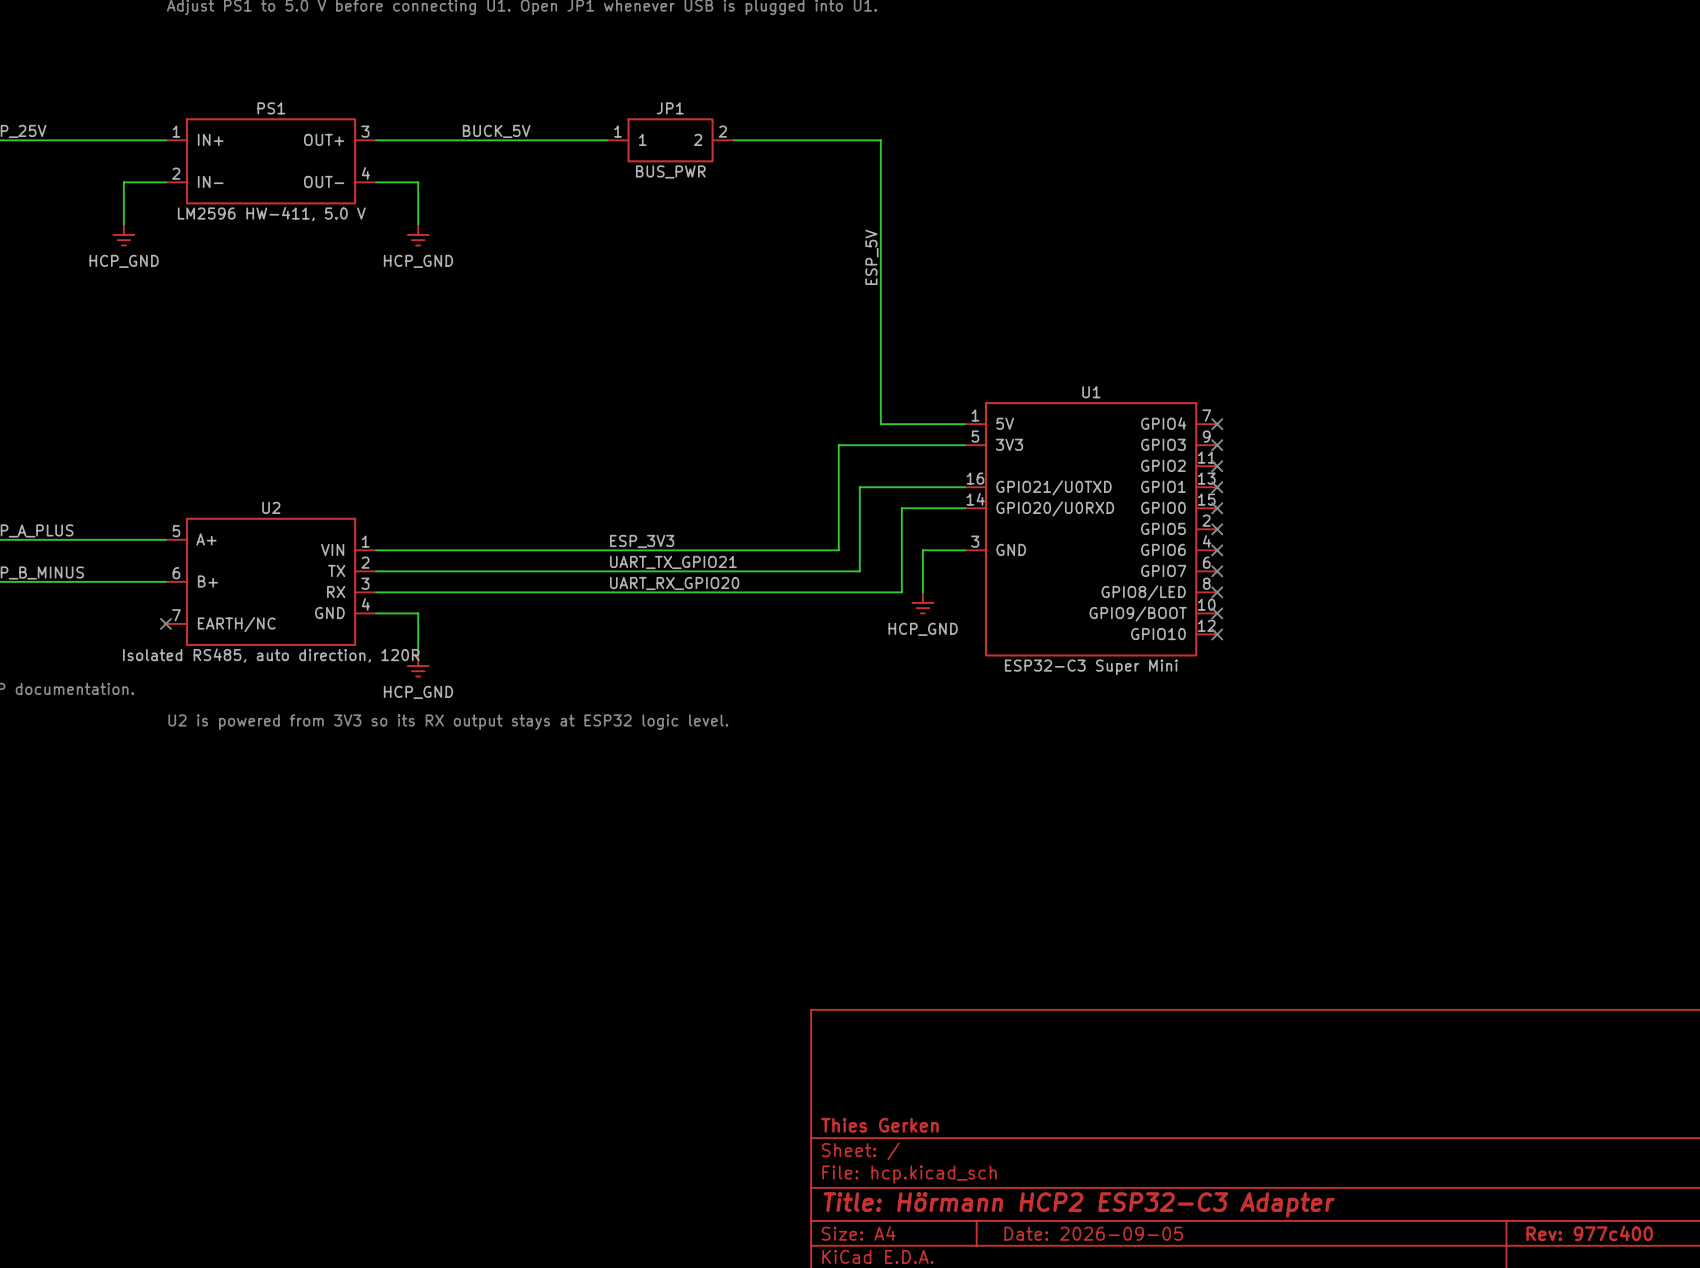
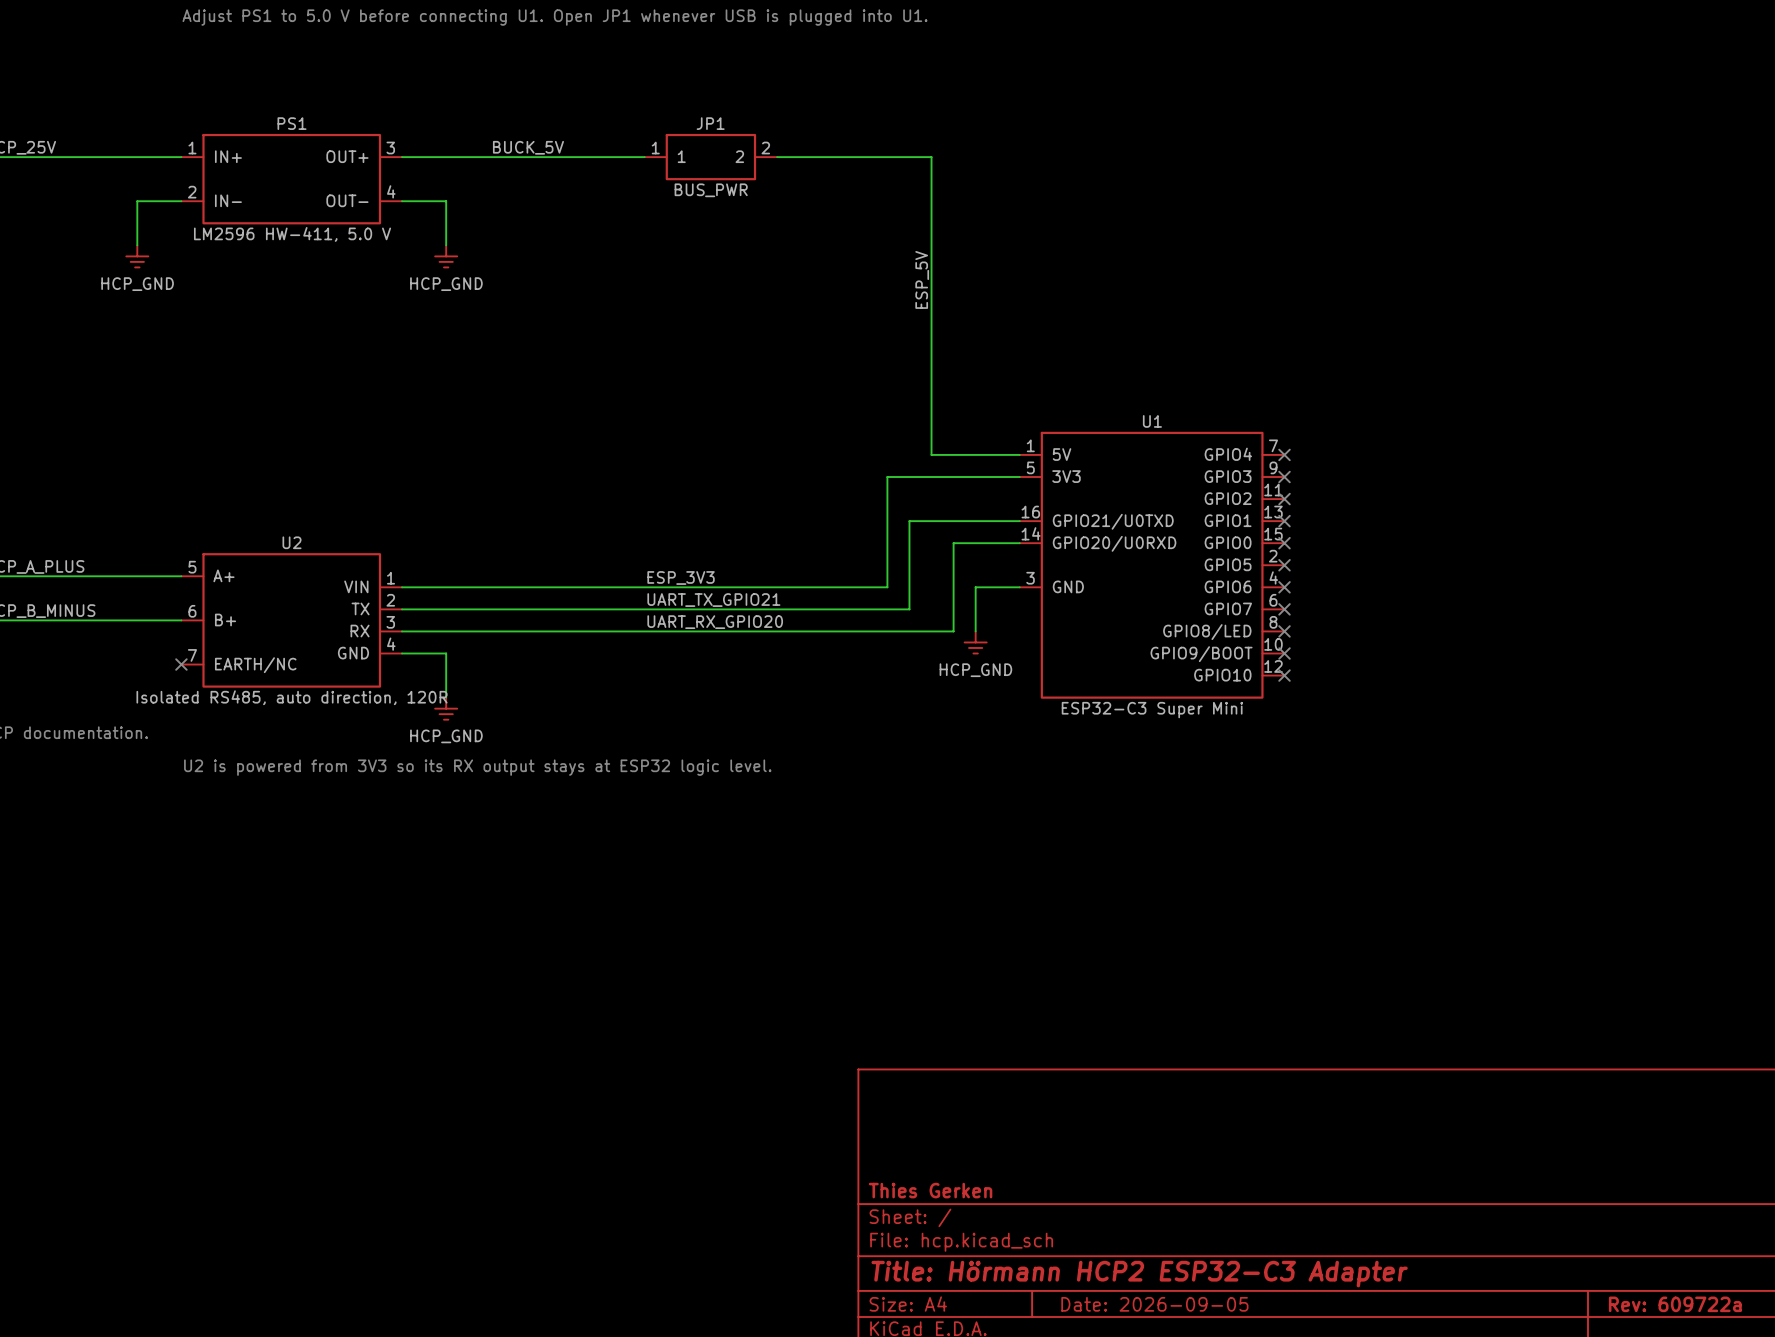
title block: Rev: 977c400 (1589, 1233) -> Rev: 609722a (1675, 1304)

